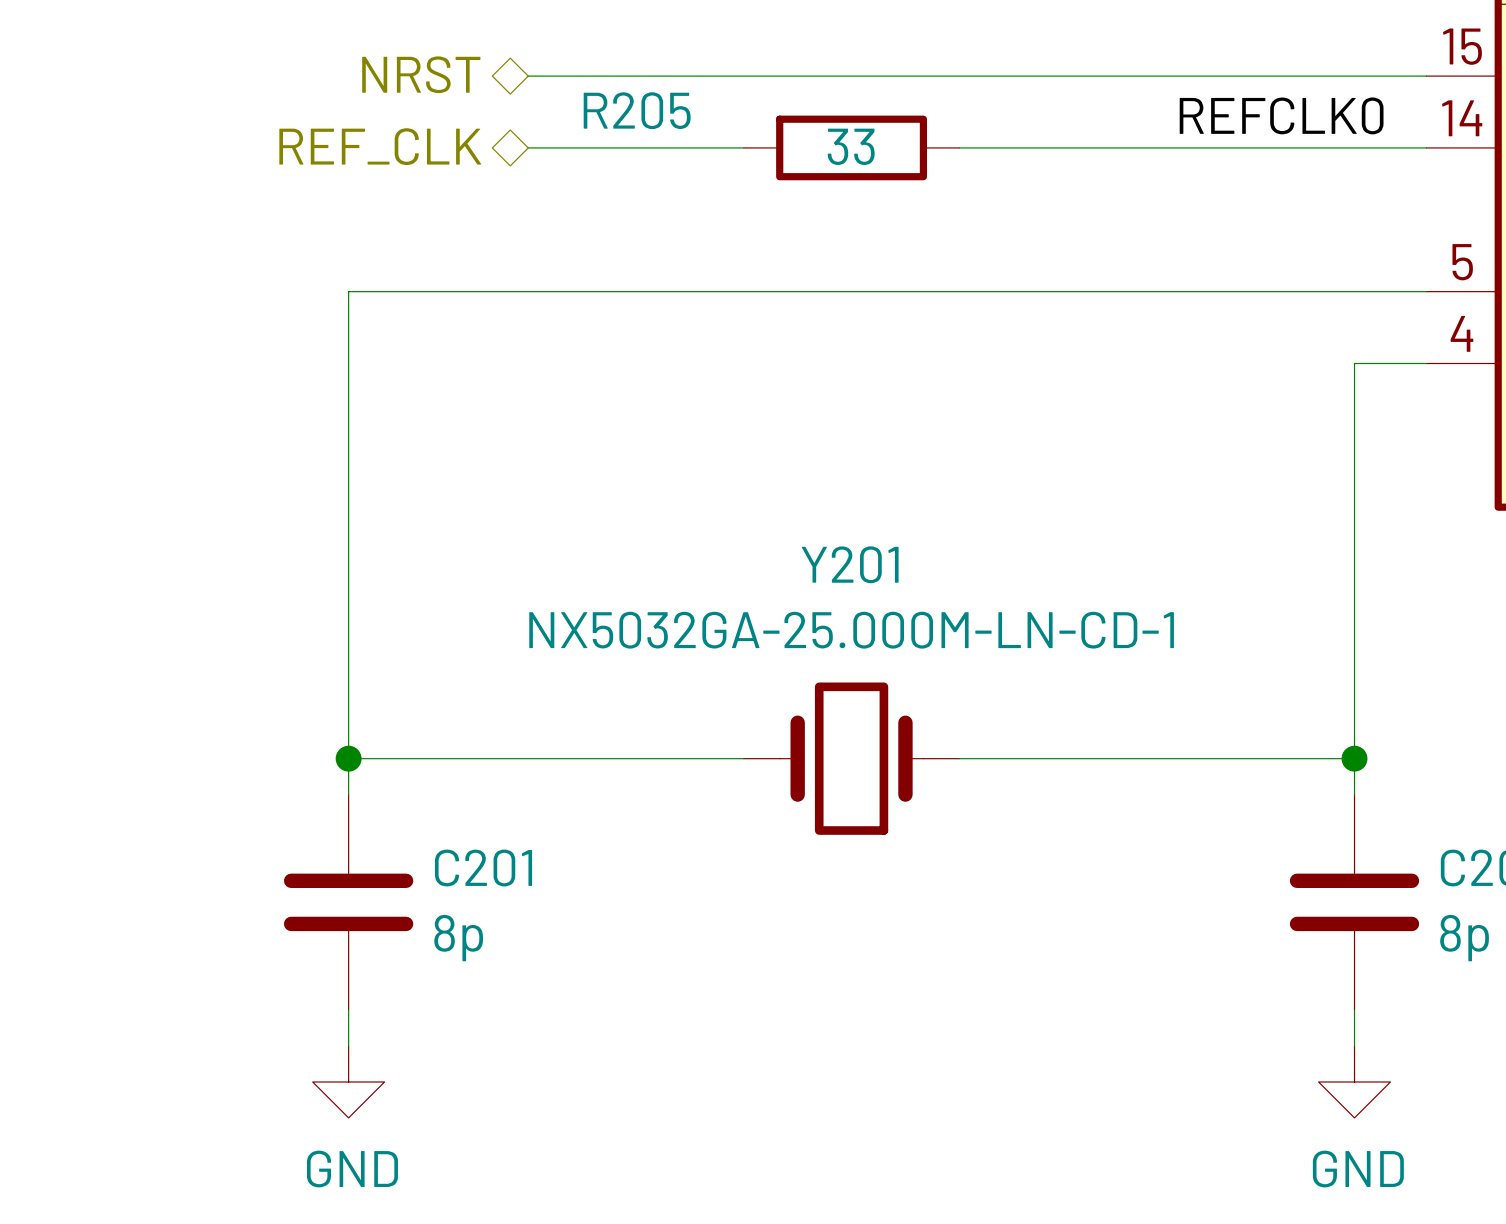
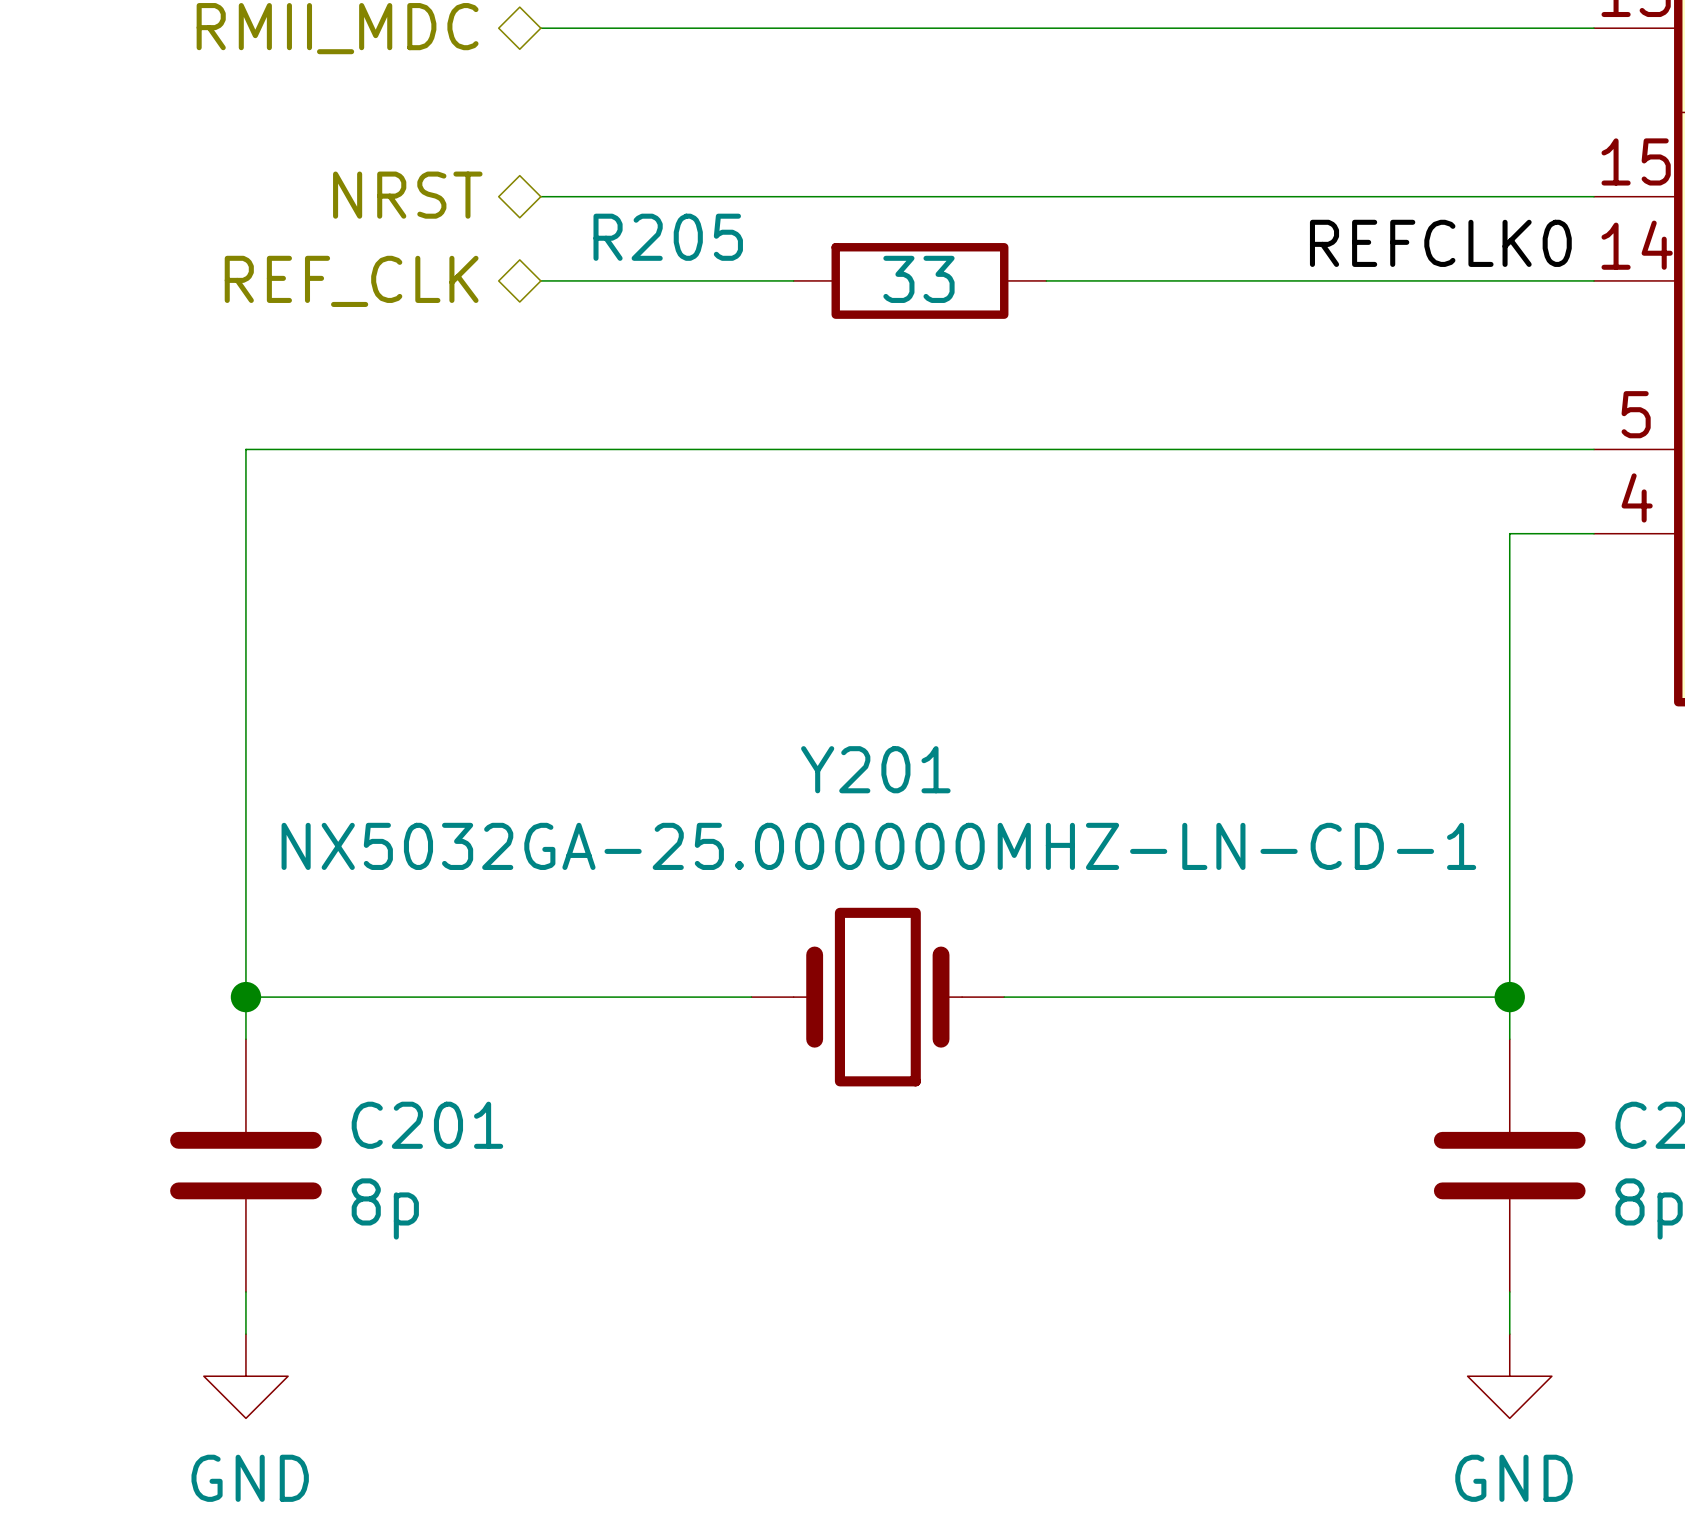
wire: (348, 291) (348, 794) -> (330, 449) (245, 449) (245, 1039)
Y201 value: NX5032GA-25.000M-LN-CD-1 (851, 630) -> NX5032GA-25.000000MHZ-LN-CD-1 (878, 846)
wire: none -> (245, 997) (330, 997)
junction position: (348, 758) -> (245, 997)
Y201 position: (851, 758) -> (877, 997)
C201 position: (348, 902) -> (245, 1165)
wire: (348, 1010) (348, 1046) -> (245, 1291) (245, 1334)
power symbol position: GND (348, 1081) -> GND (245, 1376)

